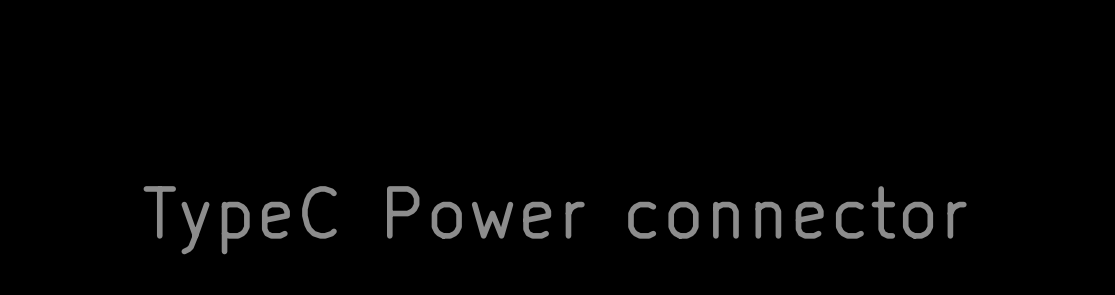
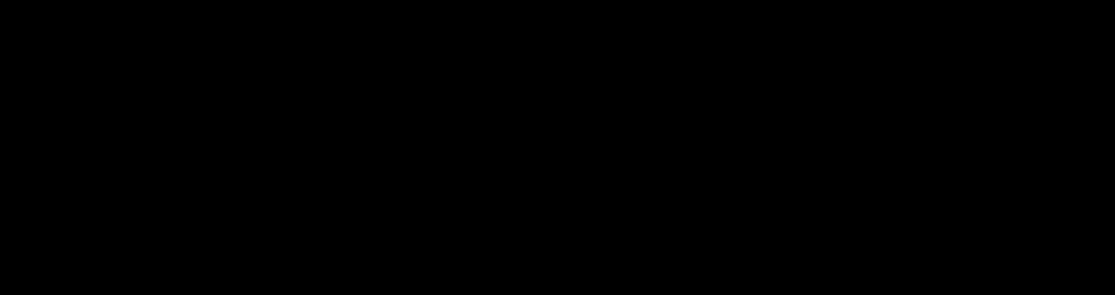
text: TypeC Power connector (555, 220) -> none

